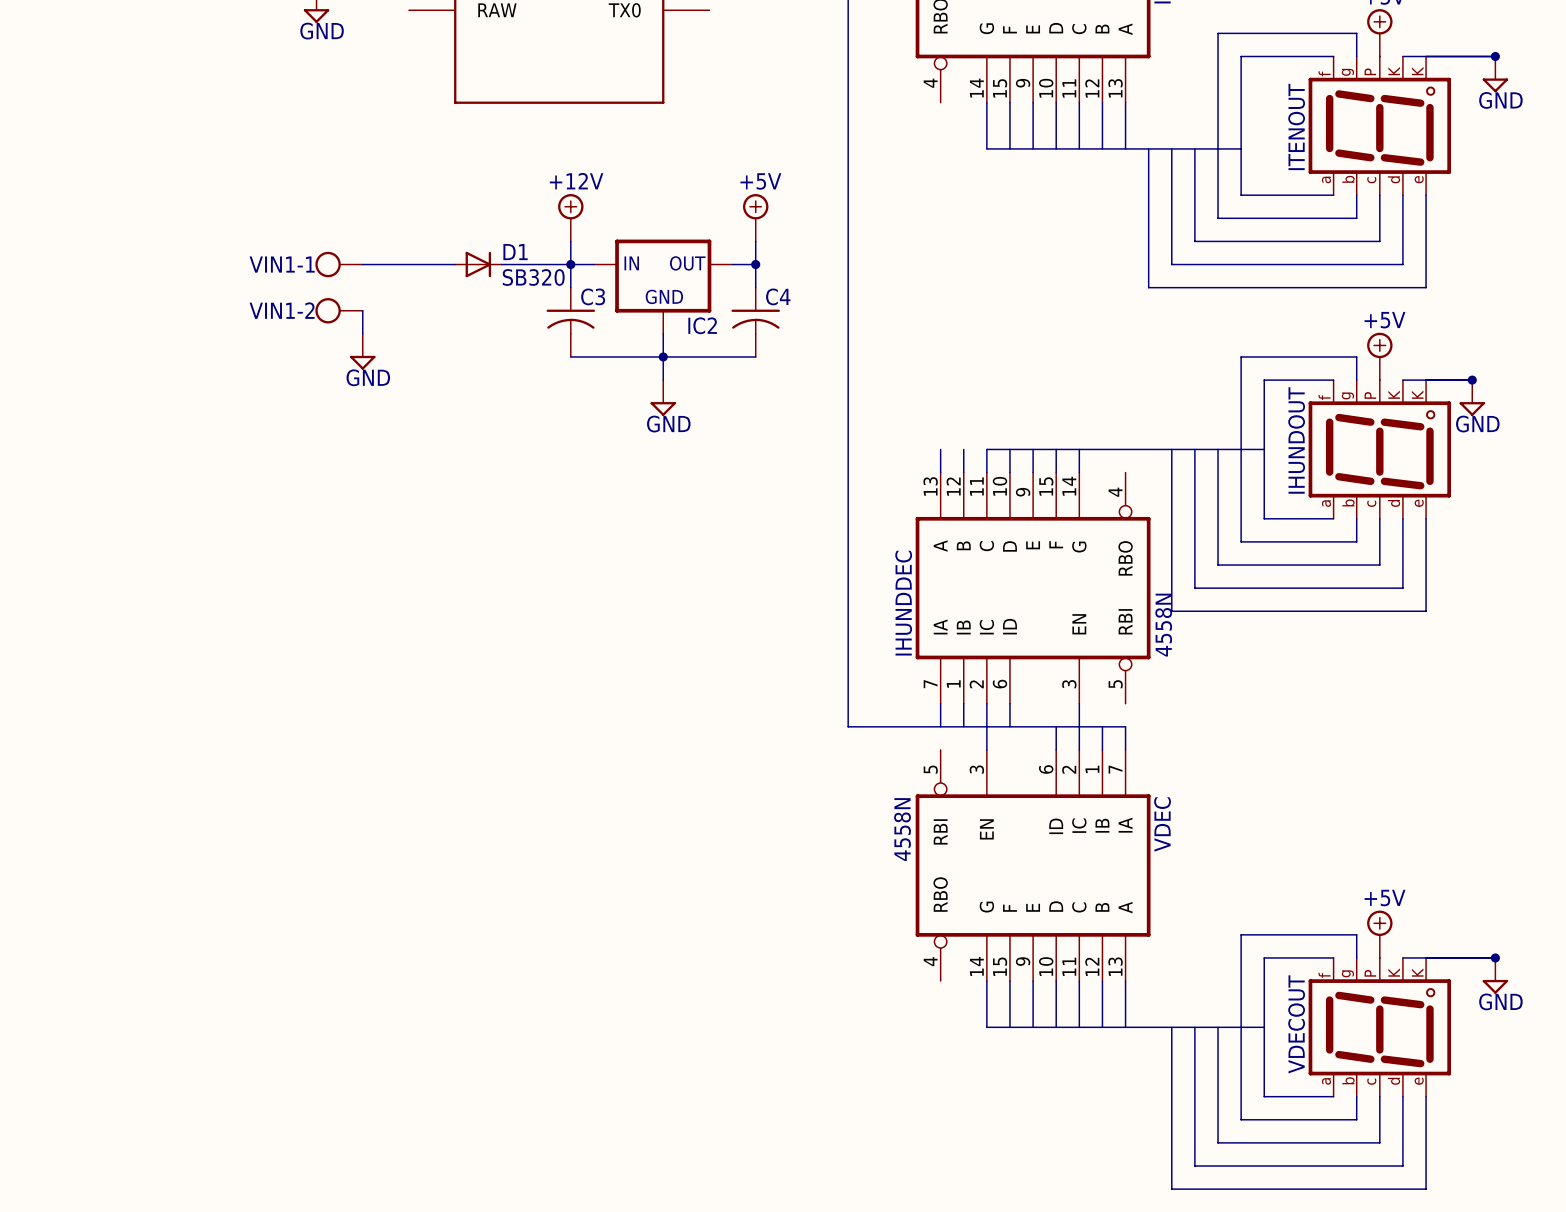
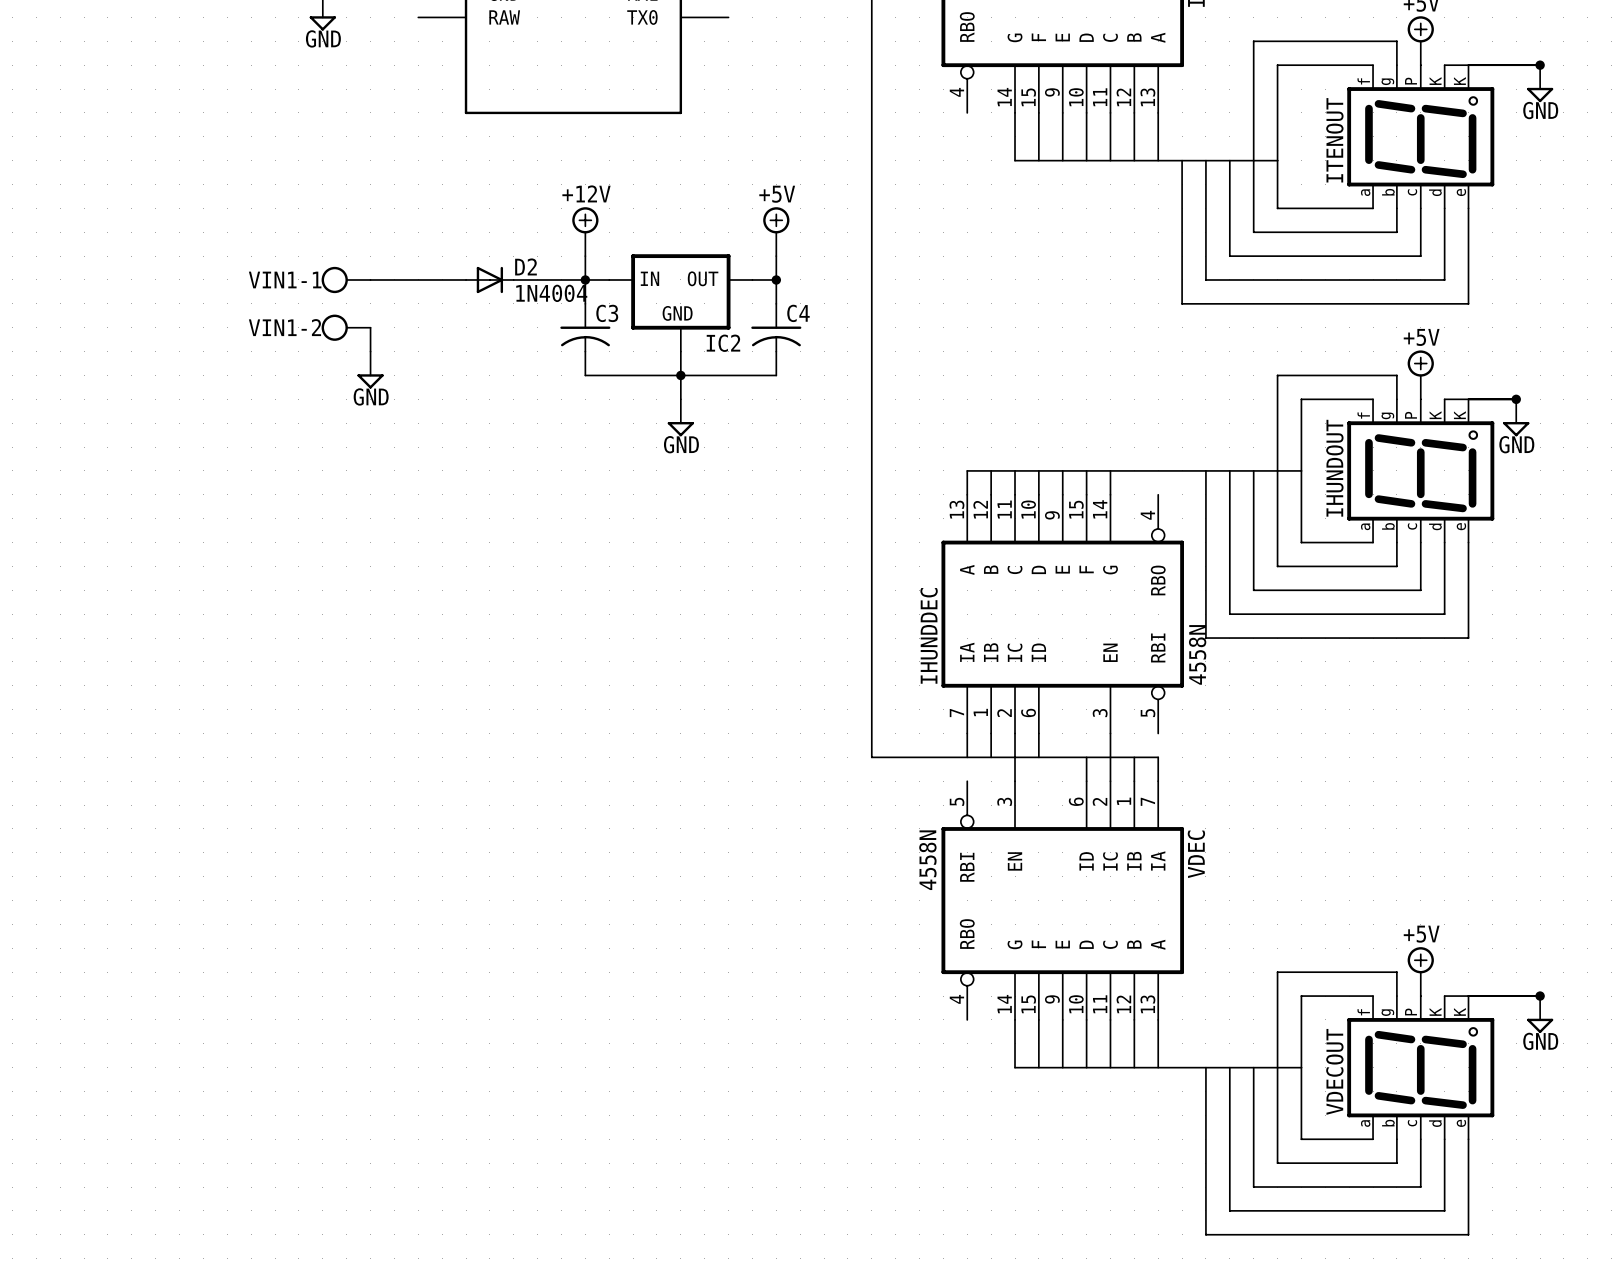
D1 name: D1 (515, 252) -> D2 (525, 266)
D1 value: SB320 (533, 277) -> 1N4004 (551, 293)
bus: none -> (967, 470) (1015, 470)

